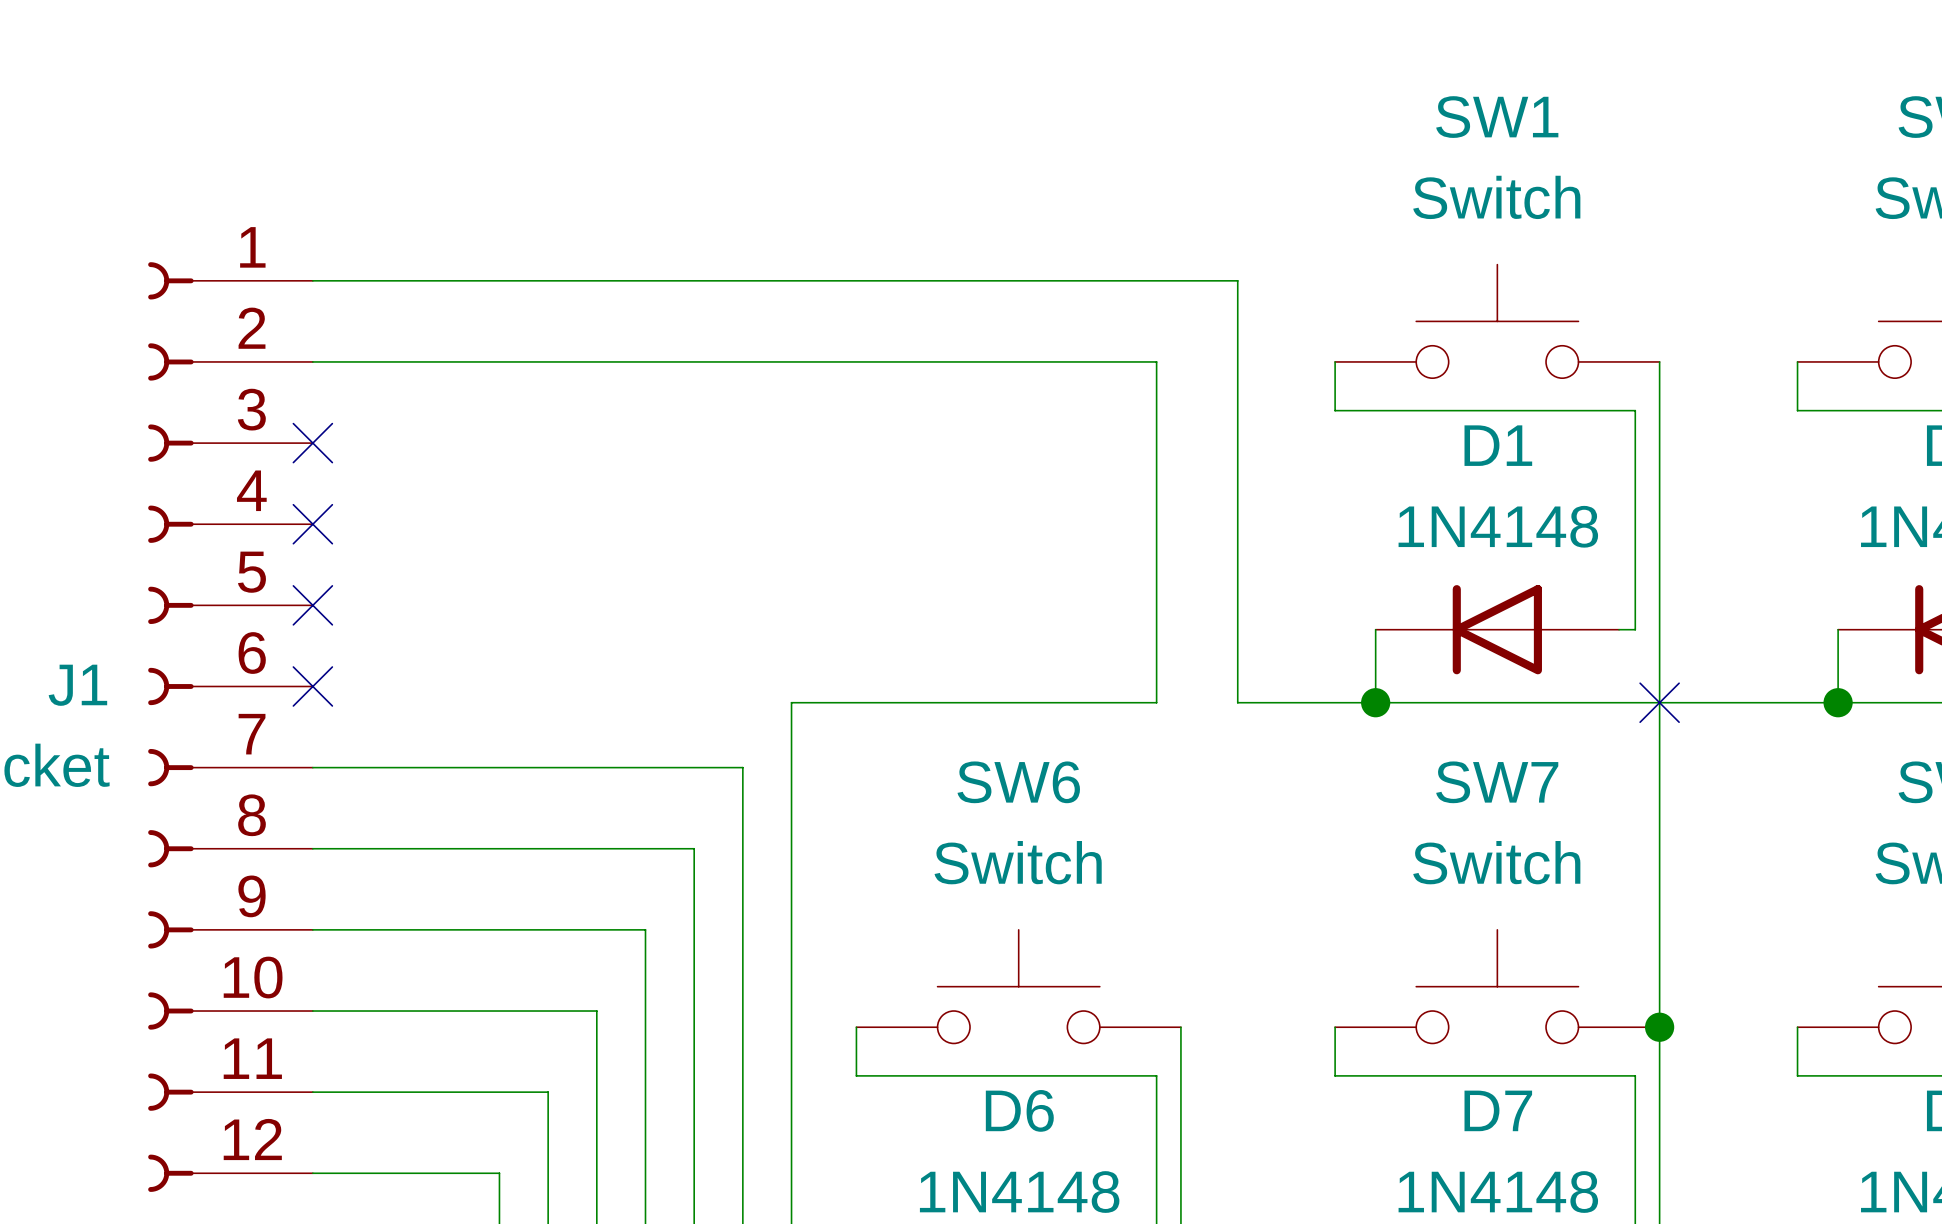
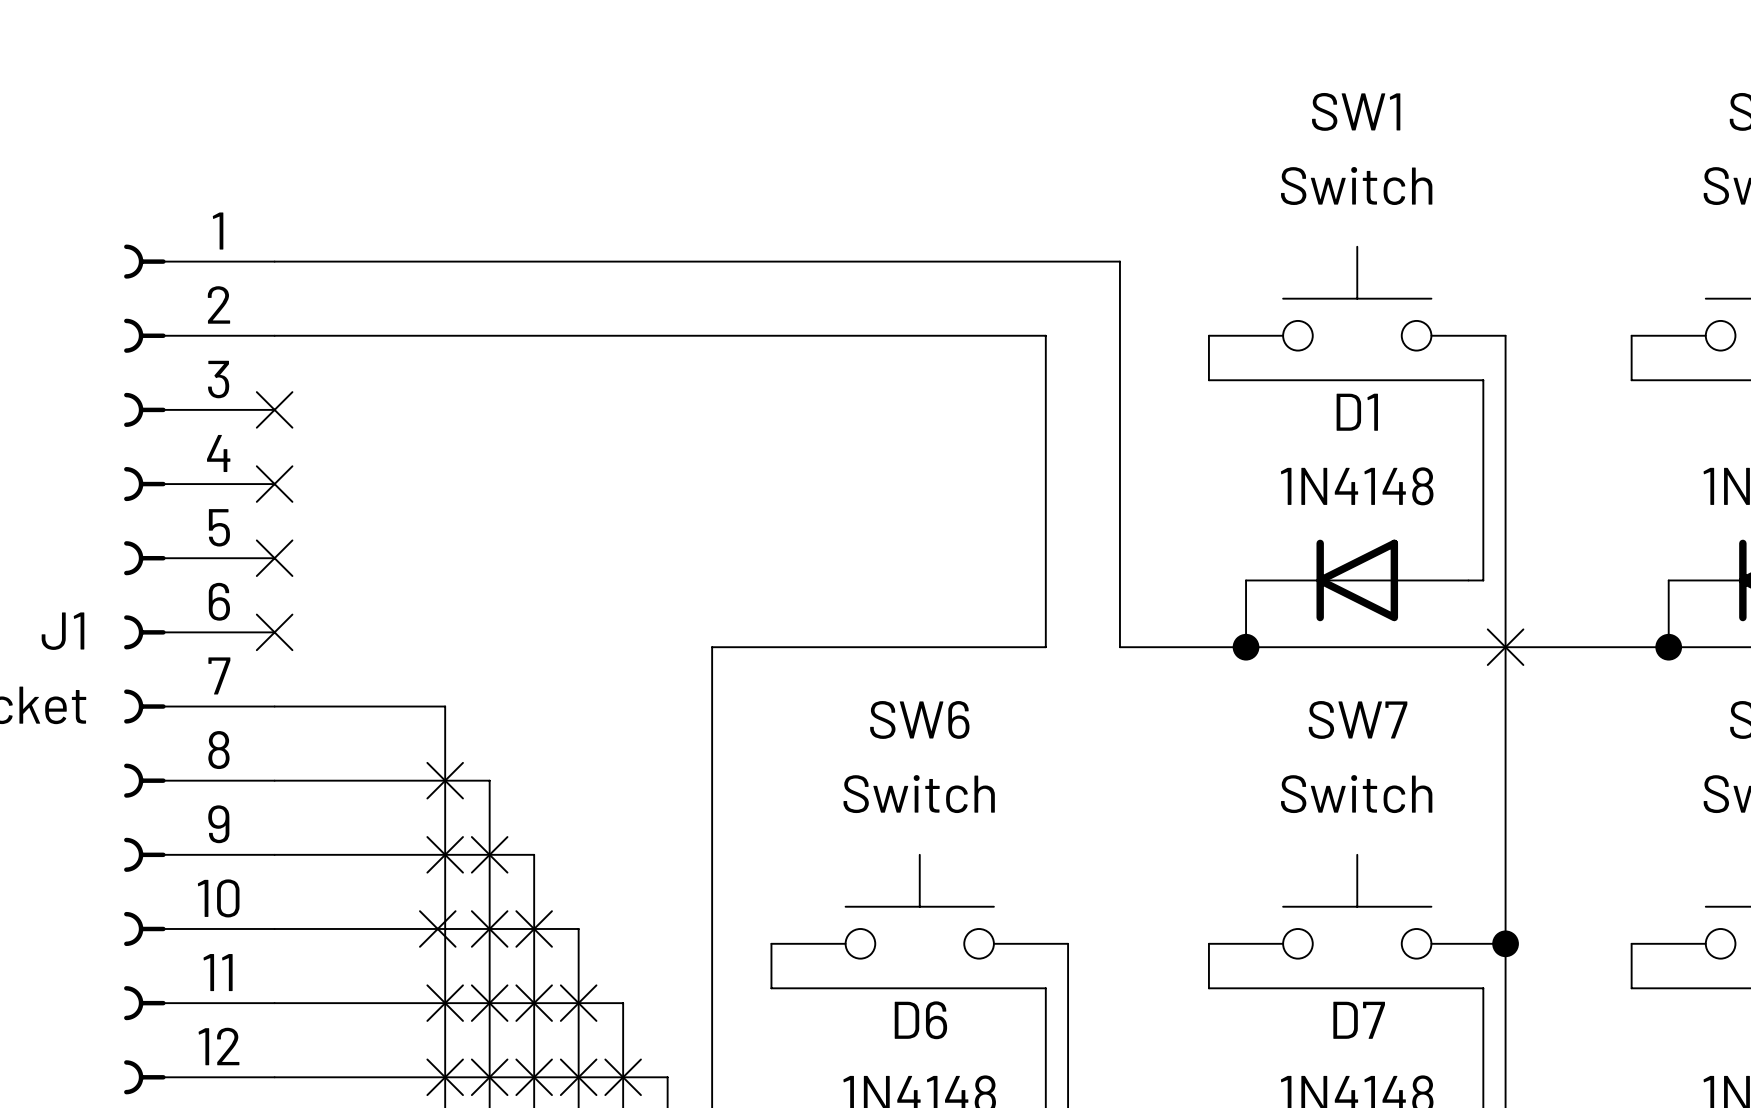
wire: (499, 767) (742, 767) (742, 1173) -> (445, 706) (445, 1077) (667, 1077)
no-connect mark: none -> (445, 780)
wire: (548, 848) (694, 848) (694, 1092) -> (489, 780) (489, 1003) (623, 1003)
no-connect mark: none -> (445, 854)
no-connect mark: none -> (489, 854)
wire: (596, 929) (645, 929) (645, 1011) -> (534, 854) (534, 928) (578, 928)
no-connect mark: none -> (437, 928)
no-connect mark: none -> (489, 928)
no-connect mark: none -> (534, 928)
no-connect mark: none -> (445, 1003)
no-connect mark: none -> (489, 1003)
no-connect mark: none -> (534, 1003)
no-connect mark: none -> (578, 1003)
no-connect mark: none -> (445, 1077)
no-connect mark: none -> (489, 1077)
no-connect mark: none -> (534, 1077)
no-connect mark: none -> (578, 1077)
no-connect mark: none -> (623, 1077)

